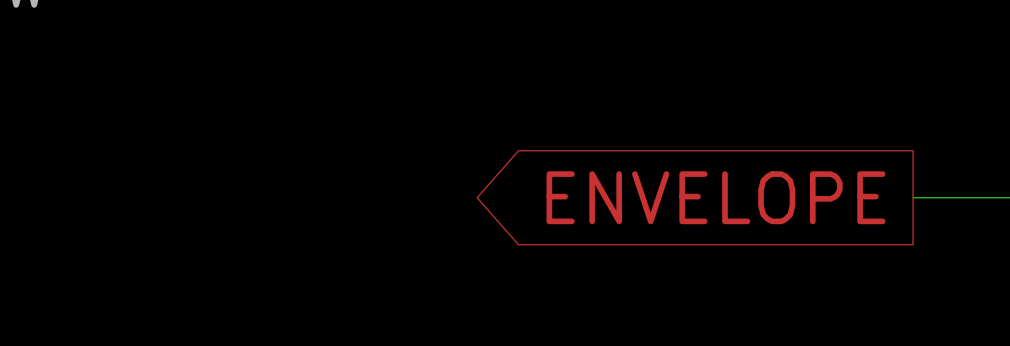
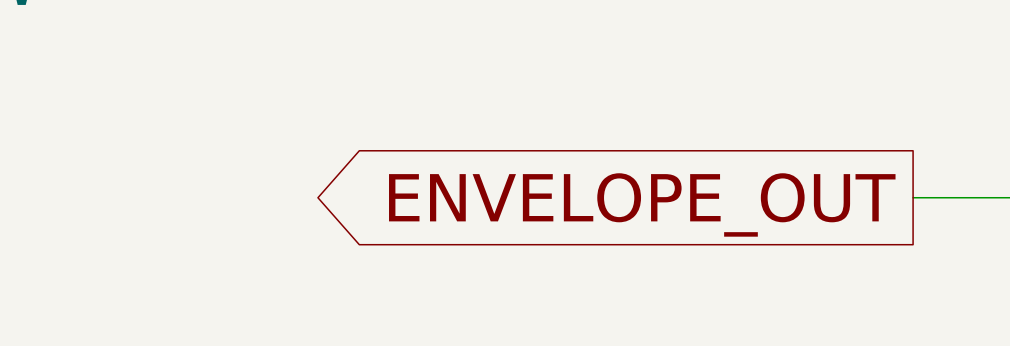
global label: ENVELOPE (715, 197) -> ENVELOPE_OUT (642, 204)

